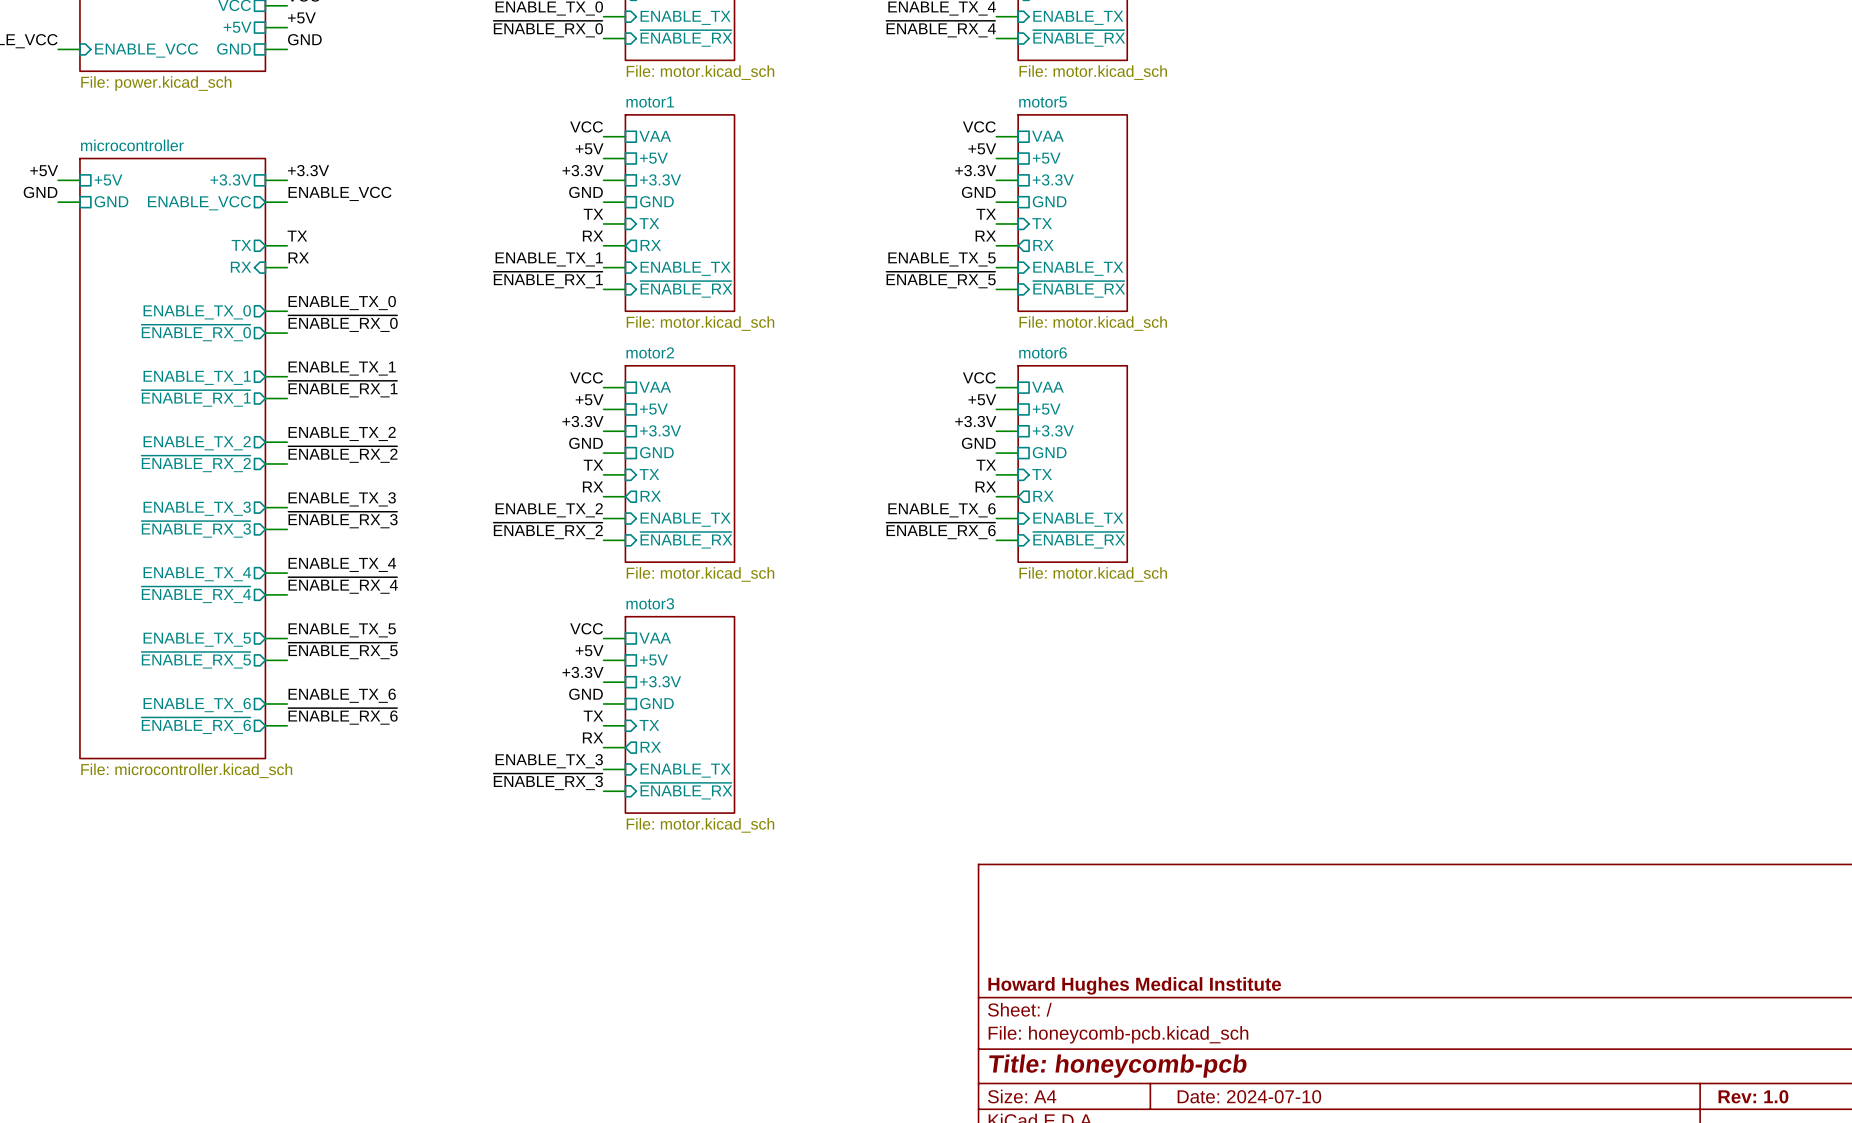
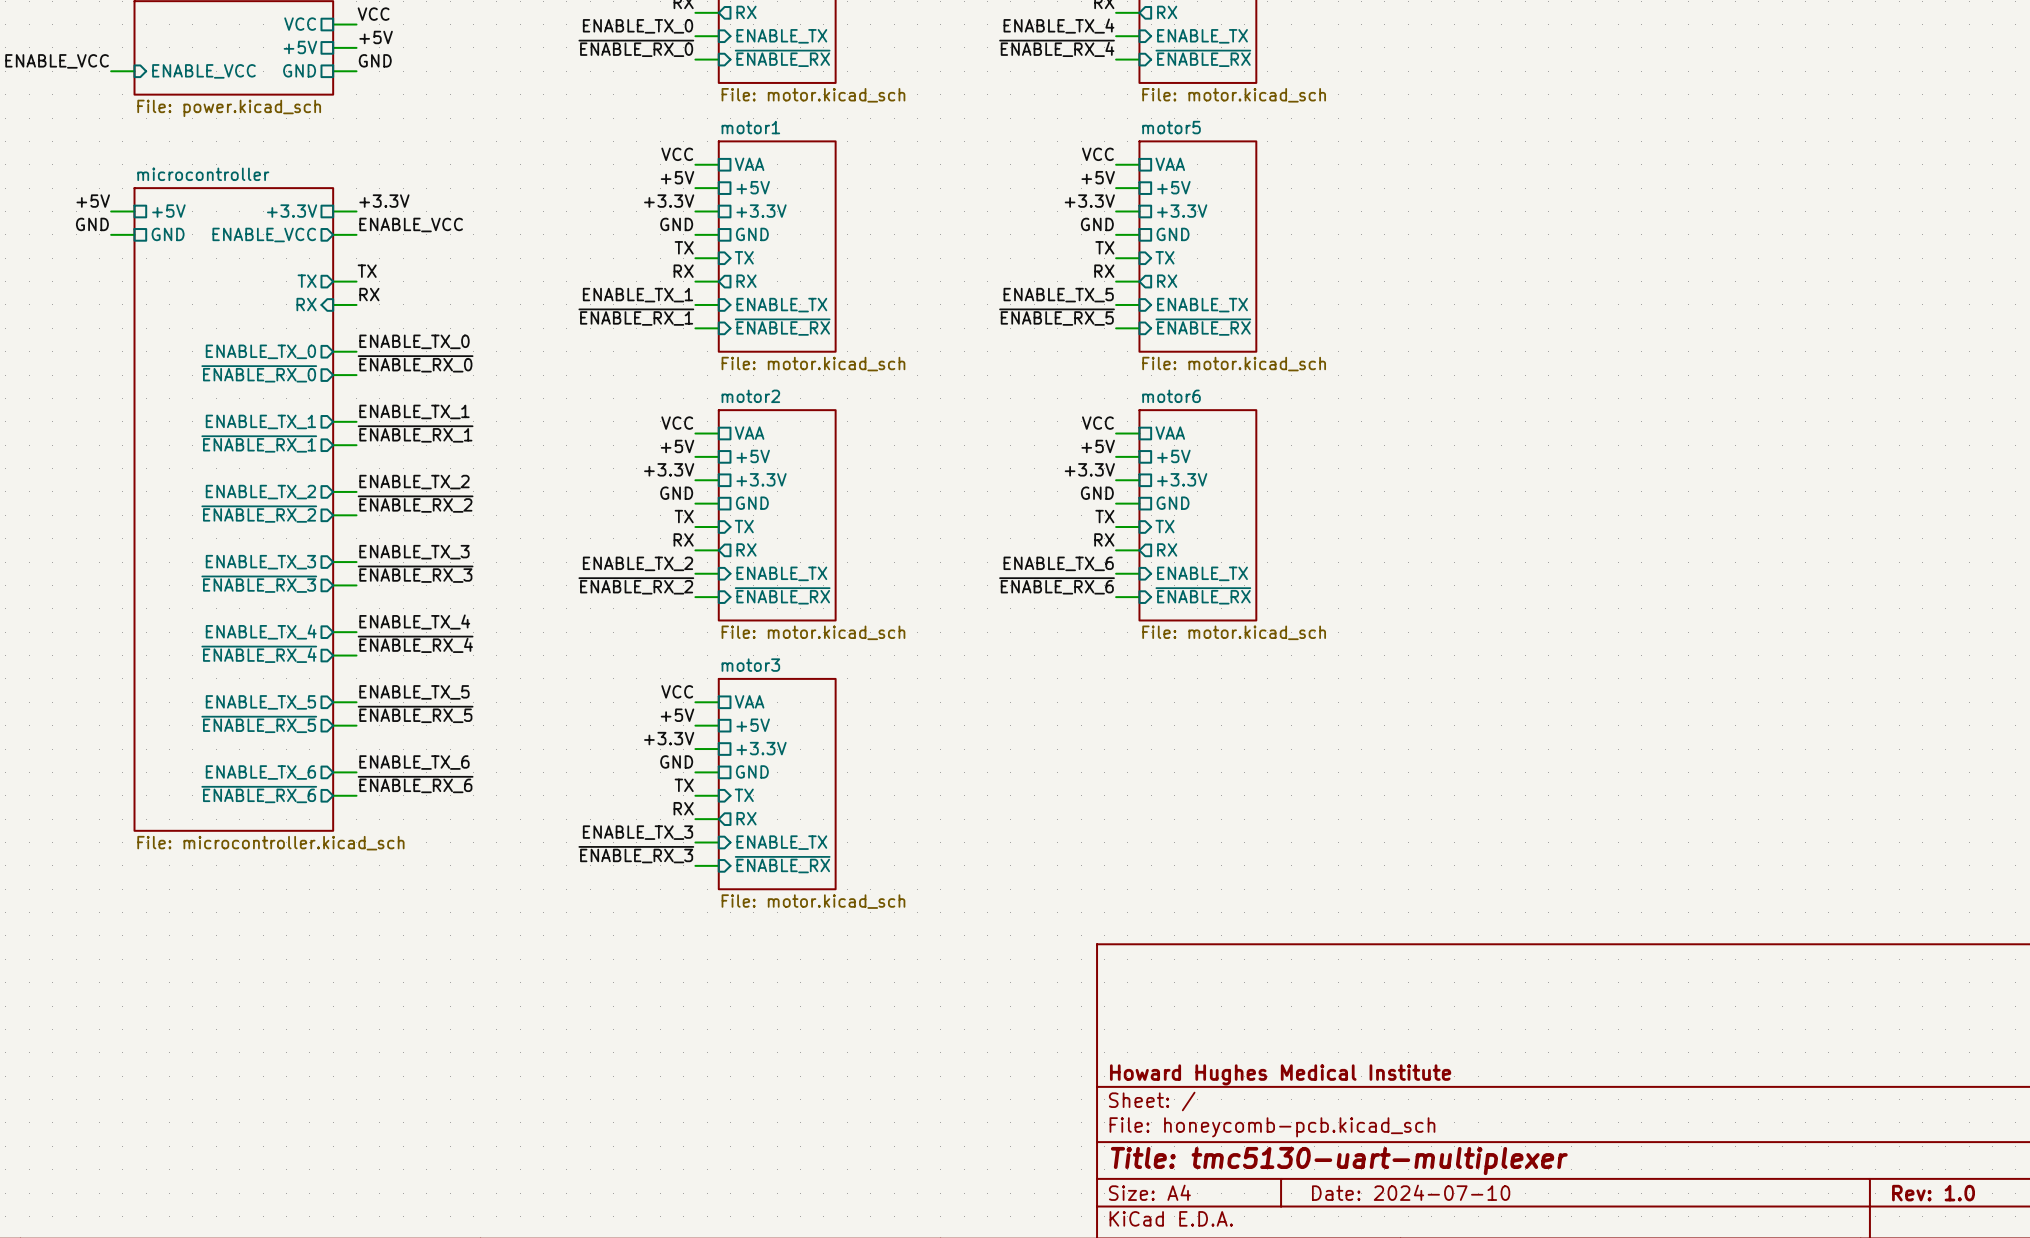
title block: Title: honeycomb-pcb (1118, 1066) -> Title: tmc5130-uart-multiplexer (1339, 1161)

